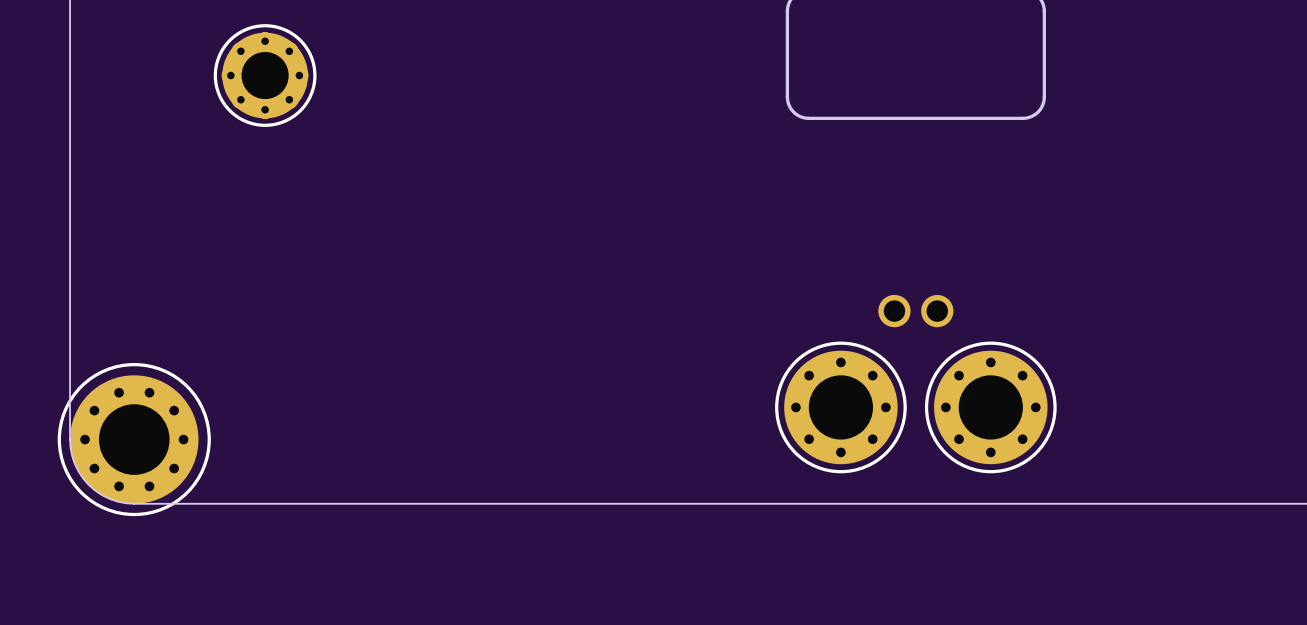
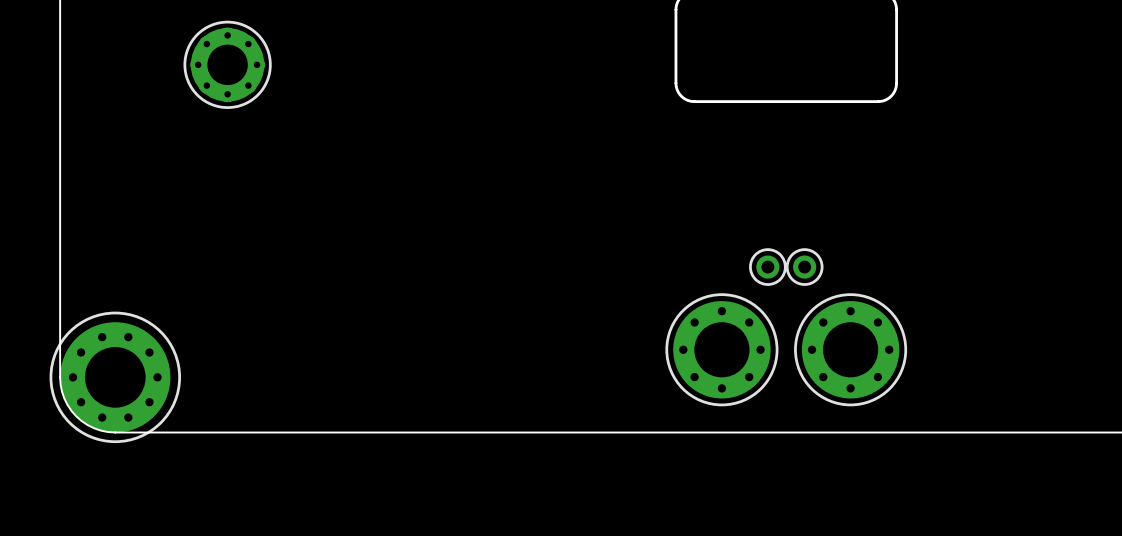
part footprint: [878, 294, 911, 328] -> [749, 248, 787, 286]
part footprint: [921, 294, 954, 328] -> [785, 248, 824, 286]

